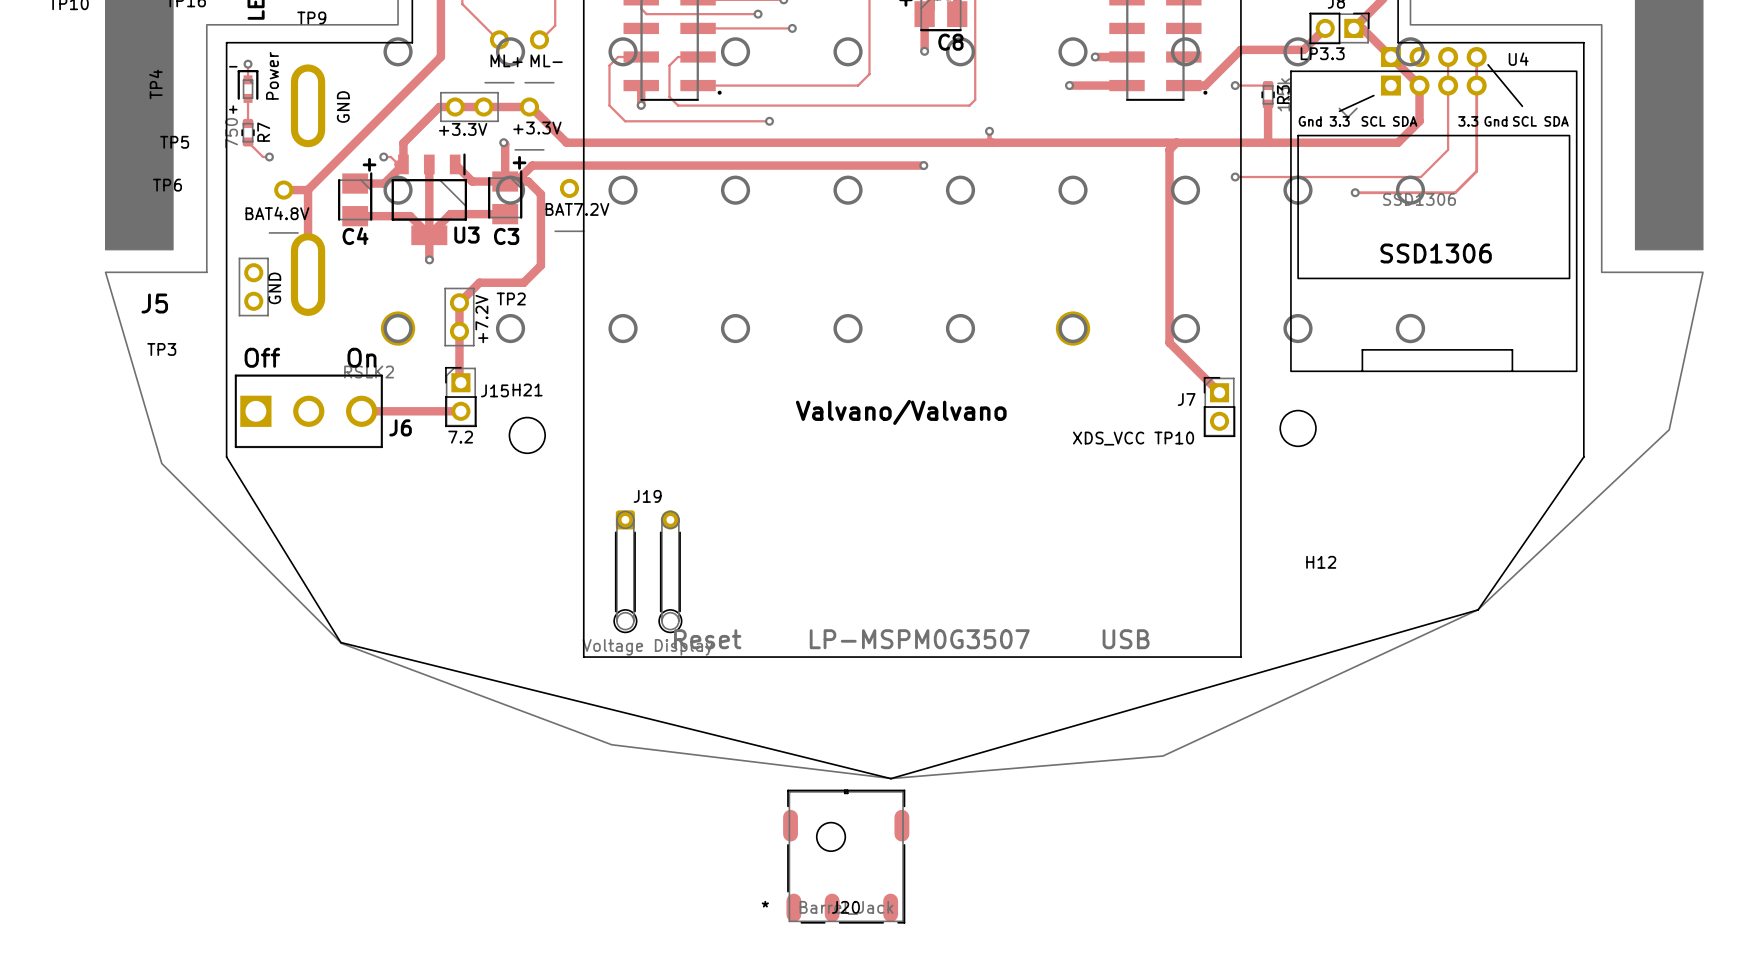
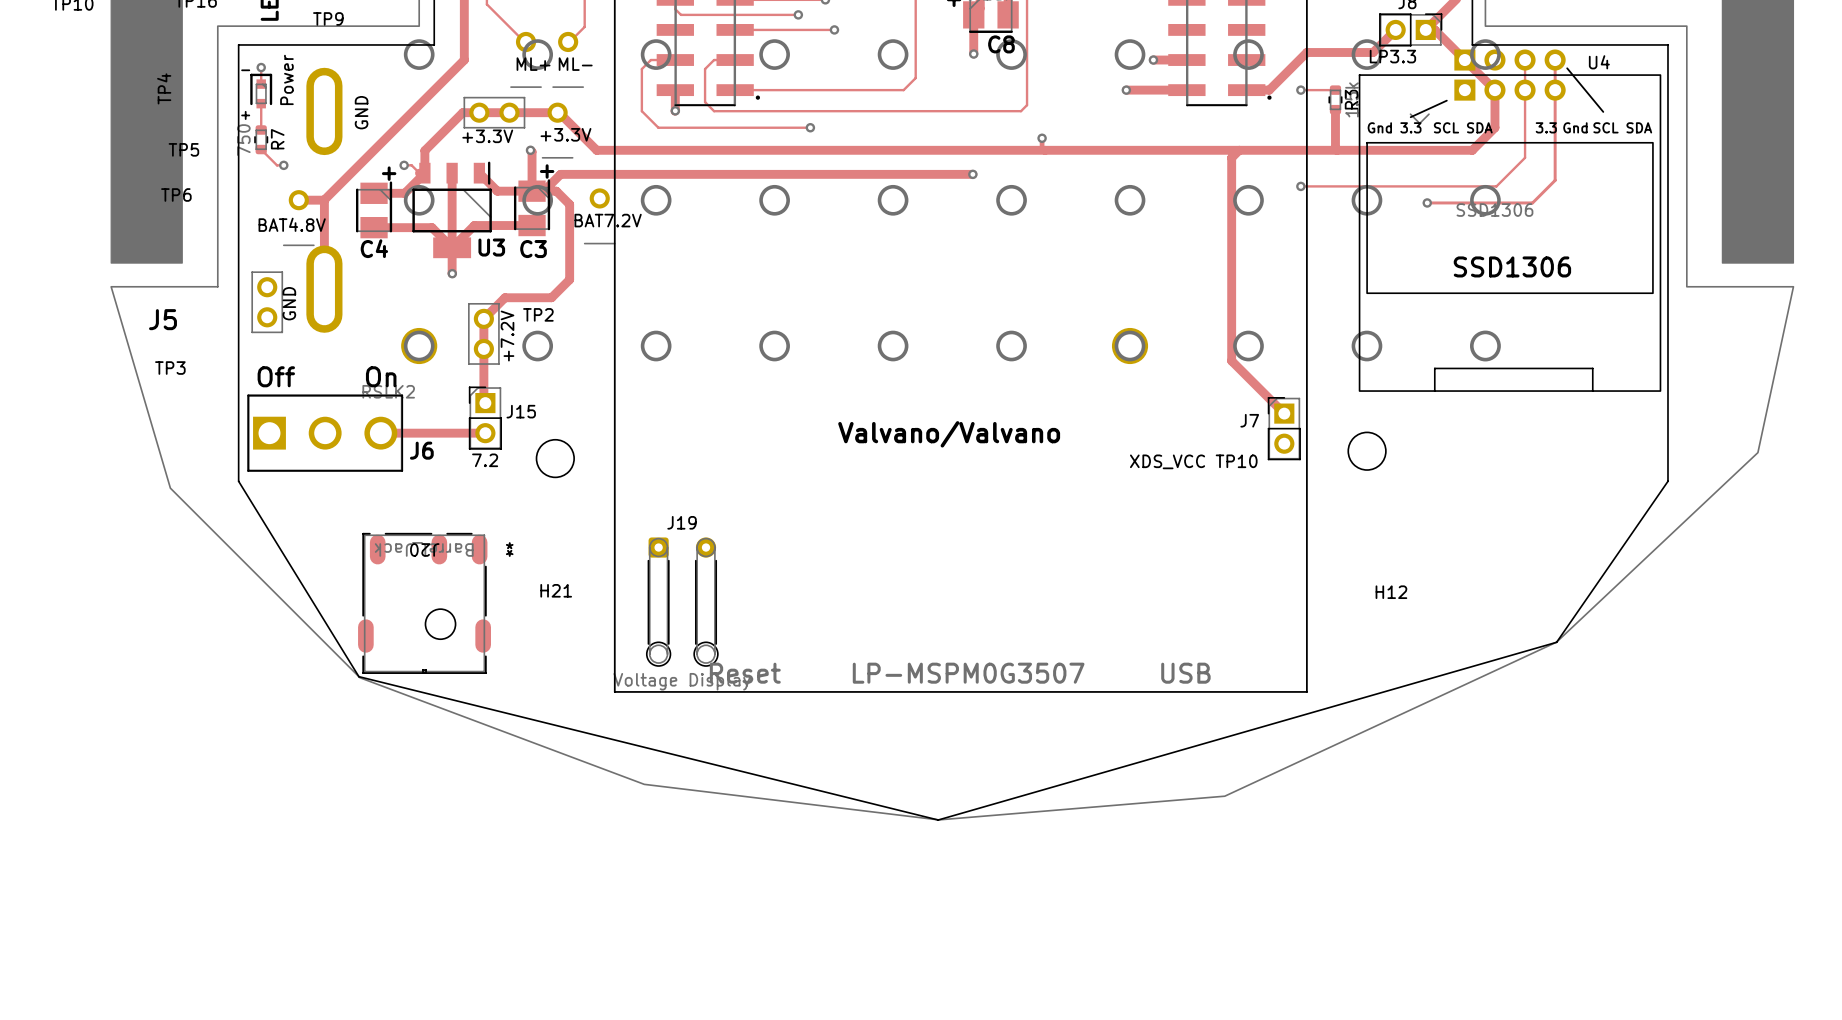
H21 name position: H21 (527, 390) -> H21 (556, 590)
J20 rotation: 0° (846, 856) -> 180° (424, 603)
J20 position: (846, 856) -> (424, 603)

